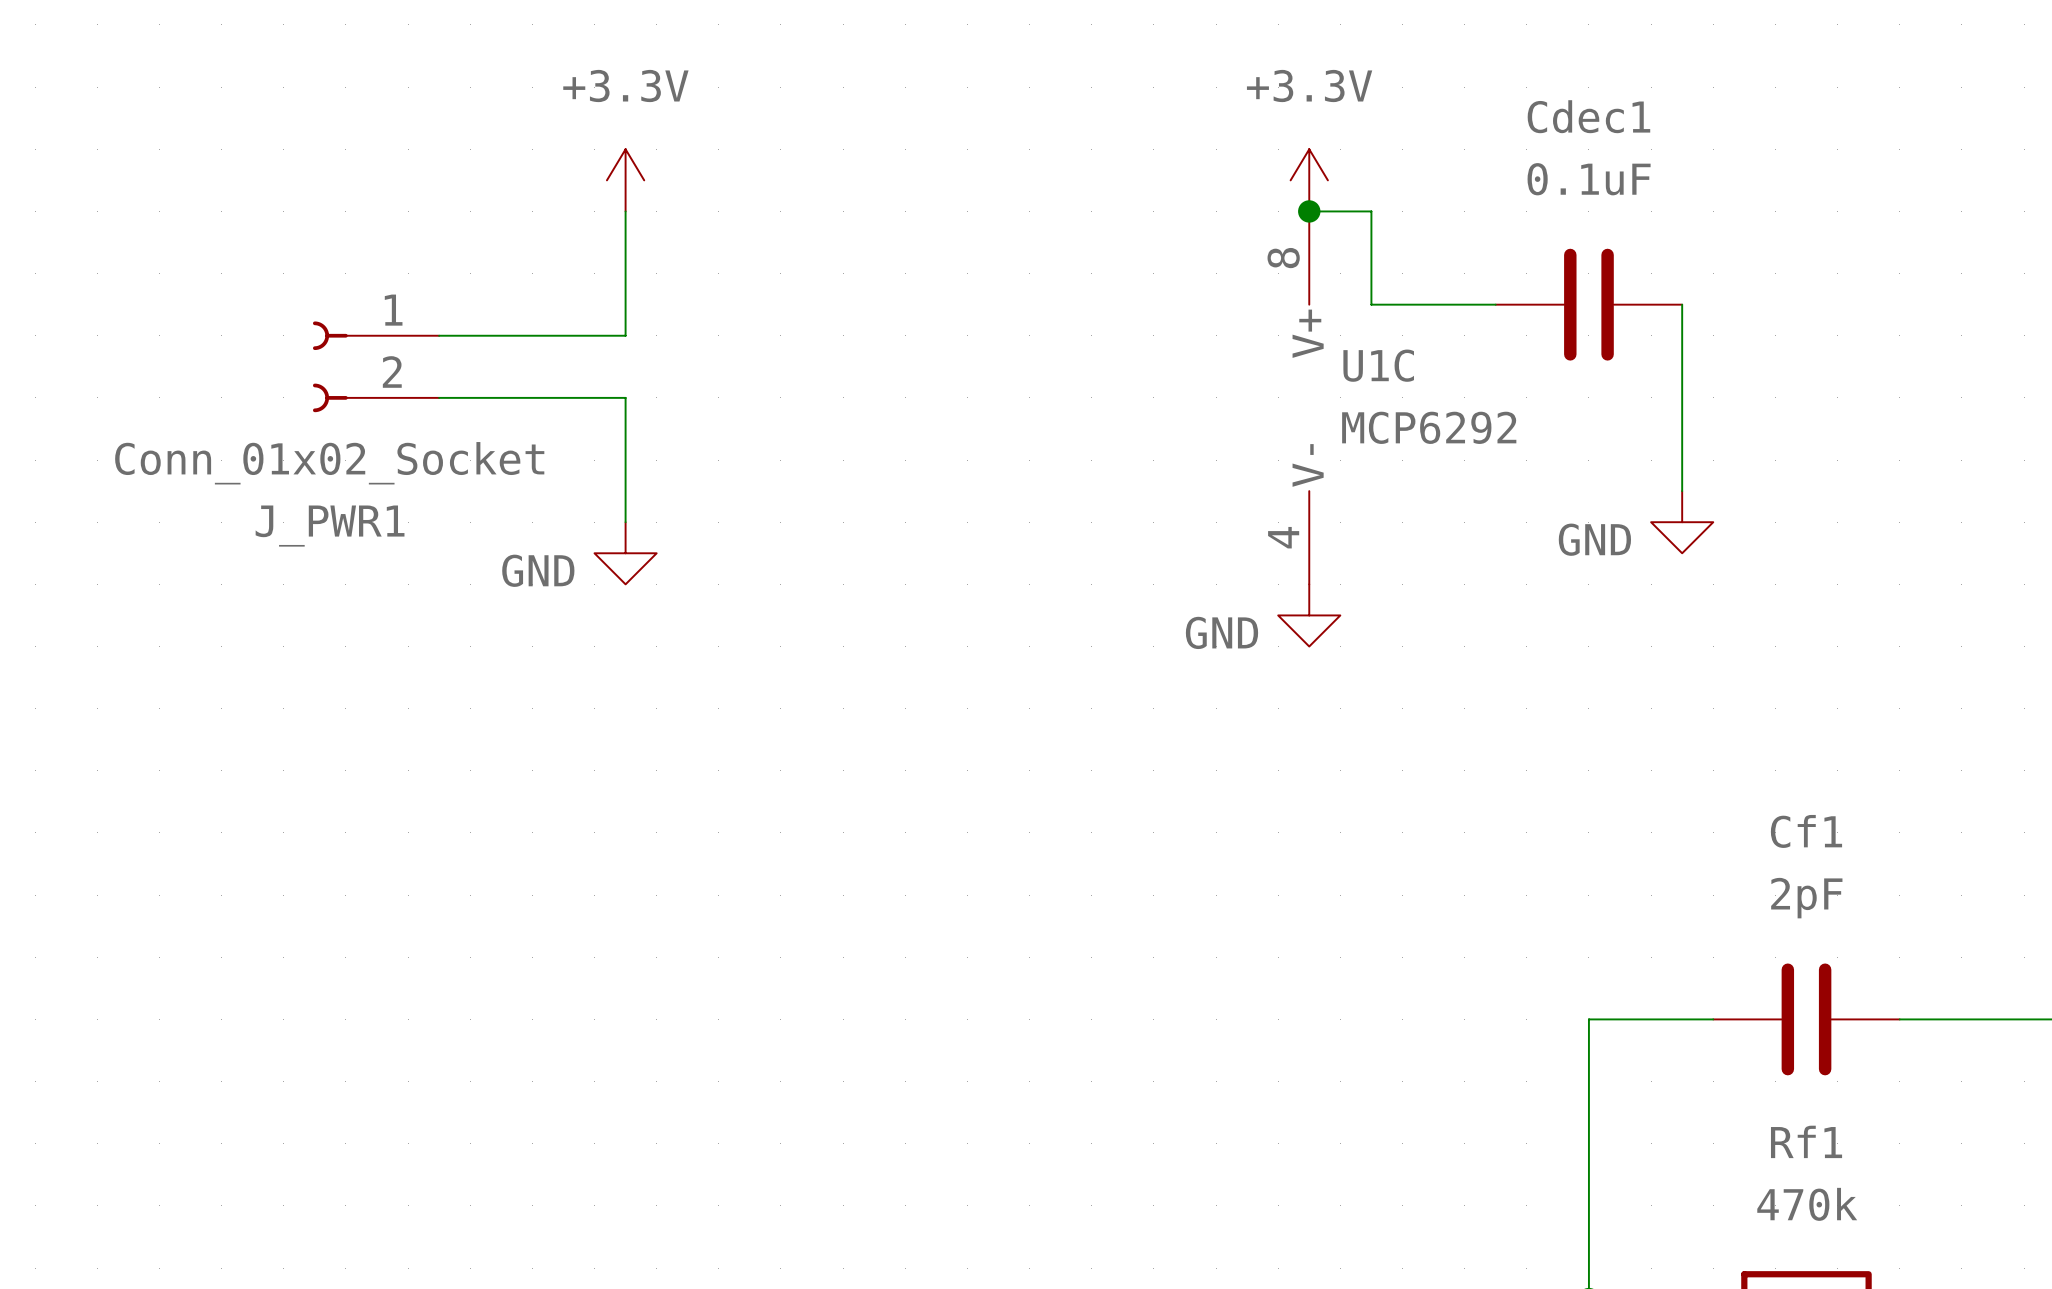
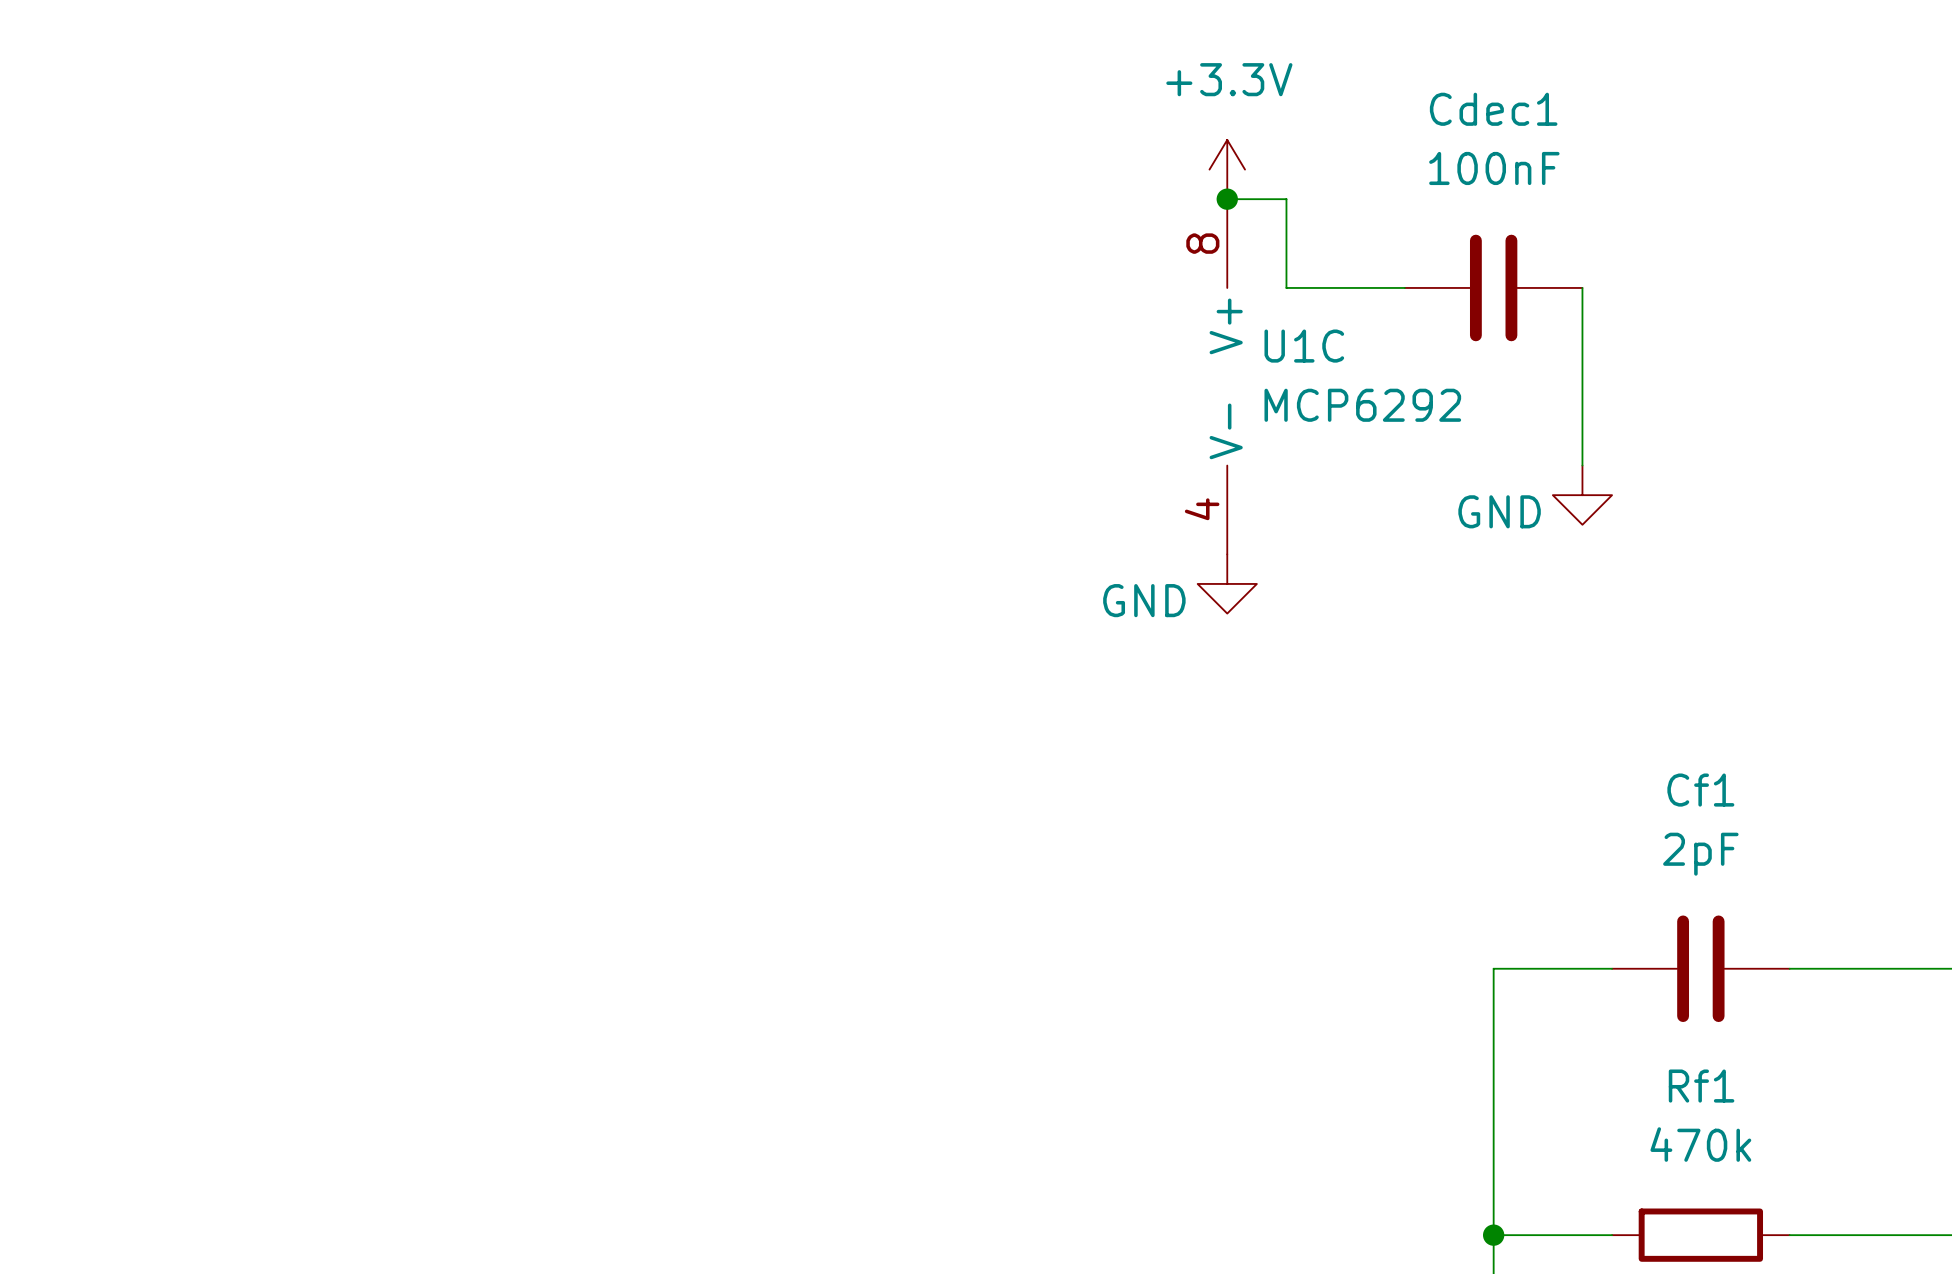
Cdec1 value: 0.1uF (1589, 179) -> 100nF (1494, 168)
power symbol: +3.3V (625, 180) -> none
wire: (625, 211) (625, 335) (439, 335) -> none
J_PWR1: Conn_01x02_Socket (376, 366) -> none
wire: (439, 397) (625, 397) (625, 522) -> none
power symbol: GND (625, 553) -> none

